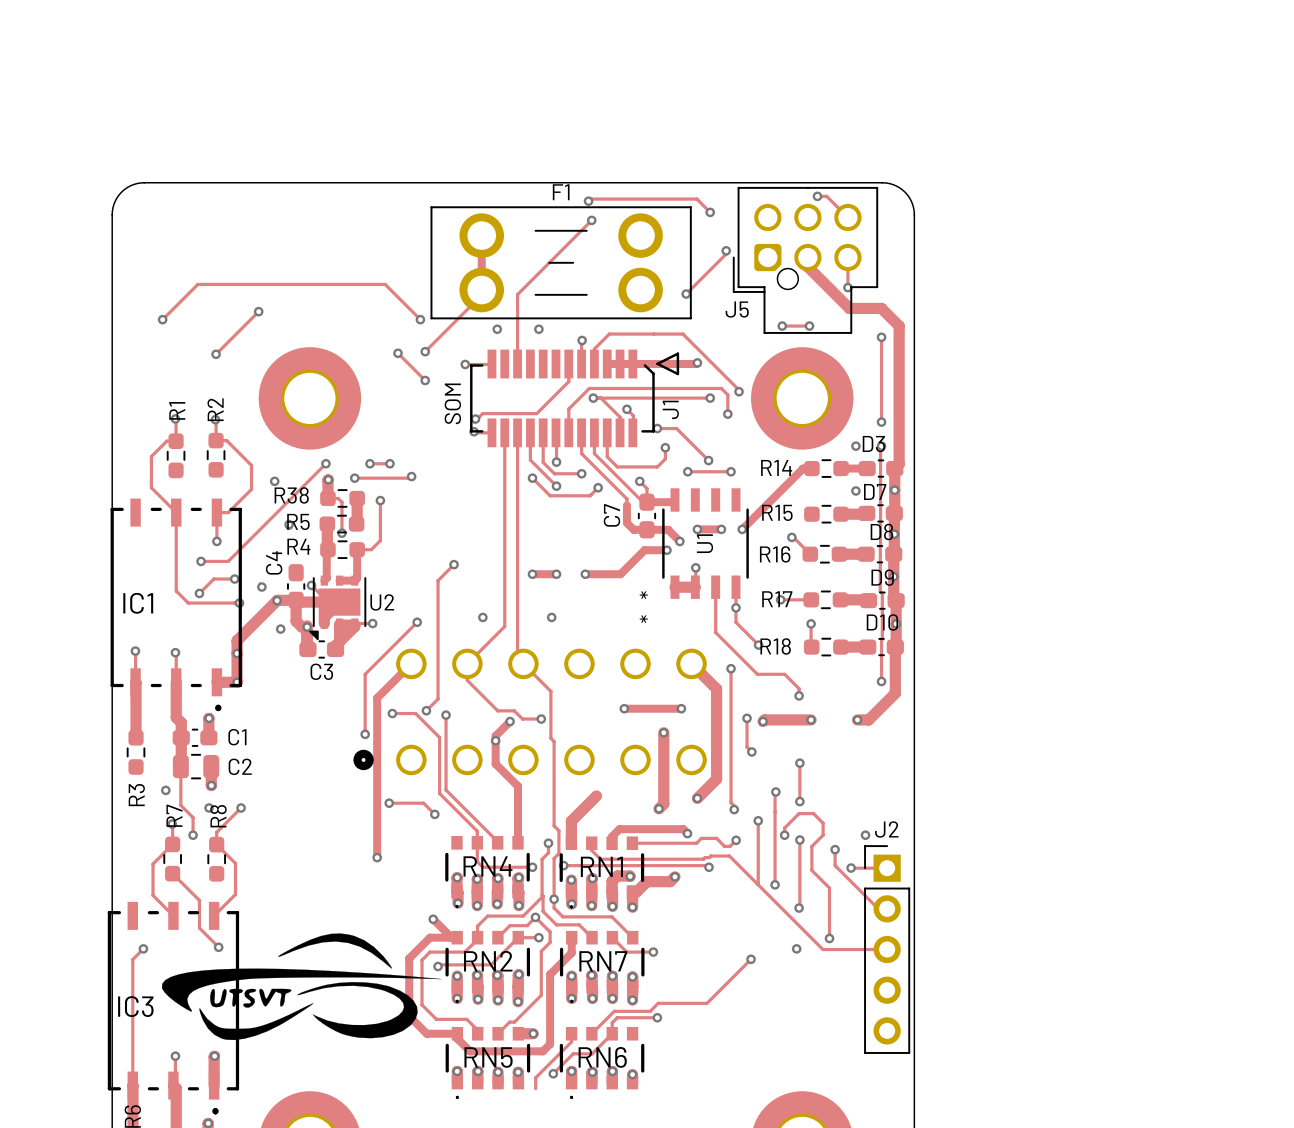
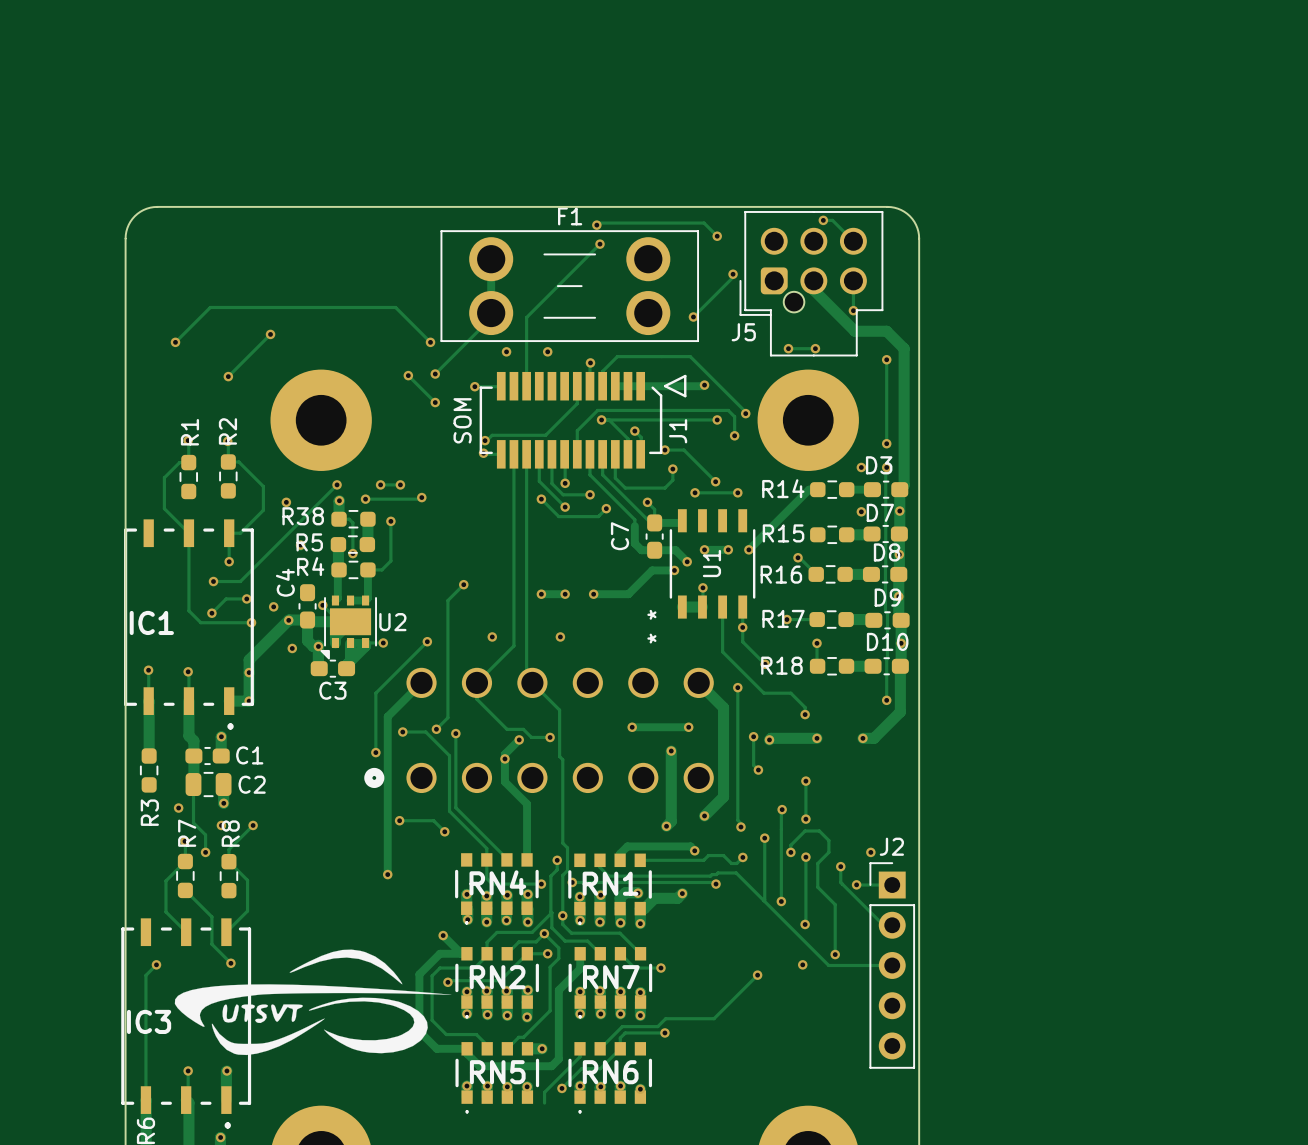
track: (596, 795) (571, 821) (571, 843) -> none

